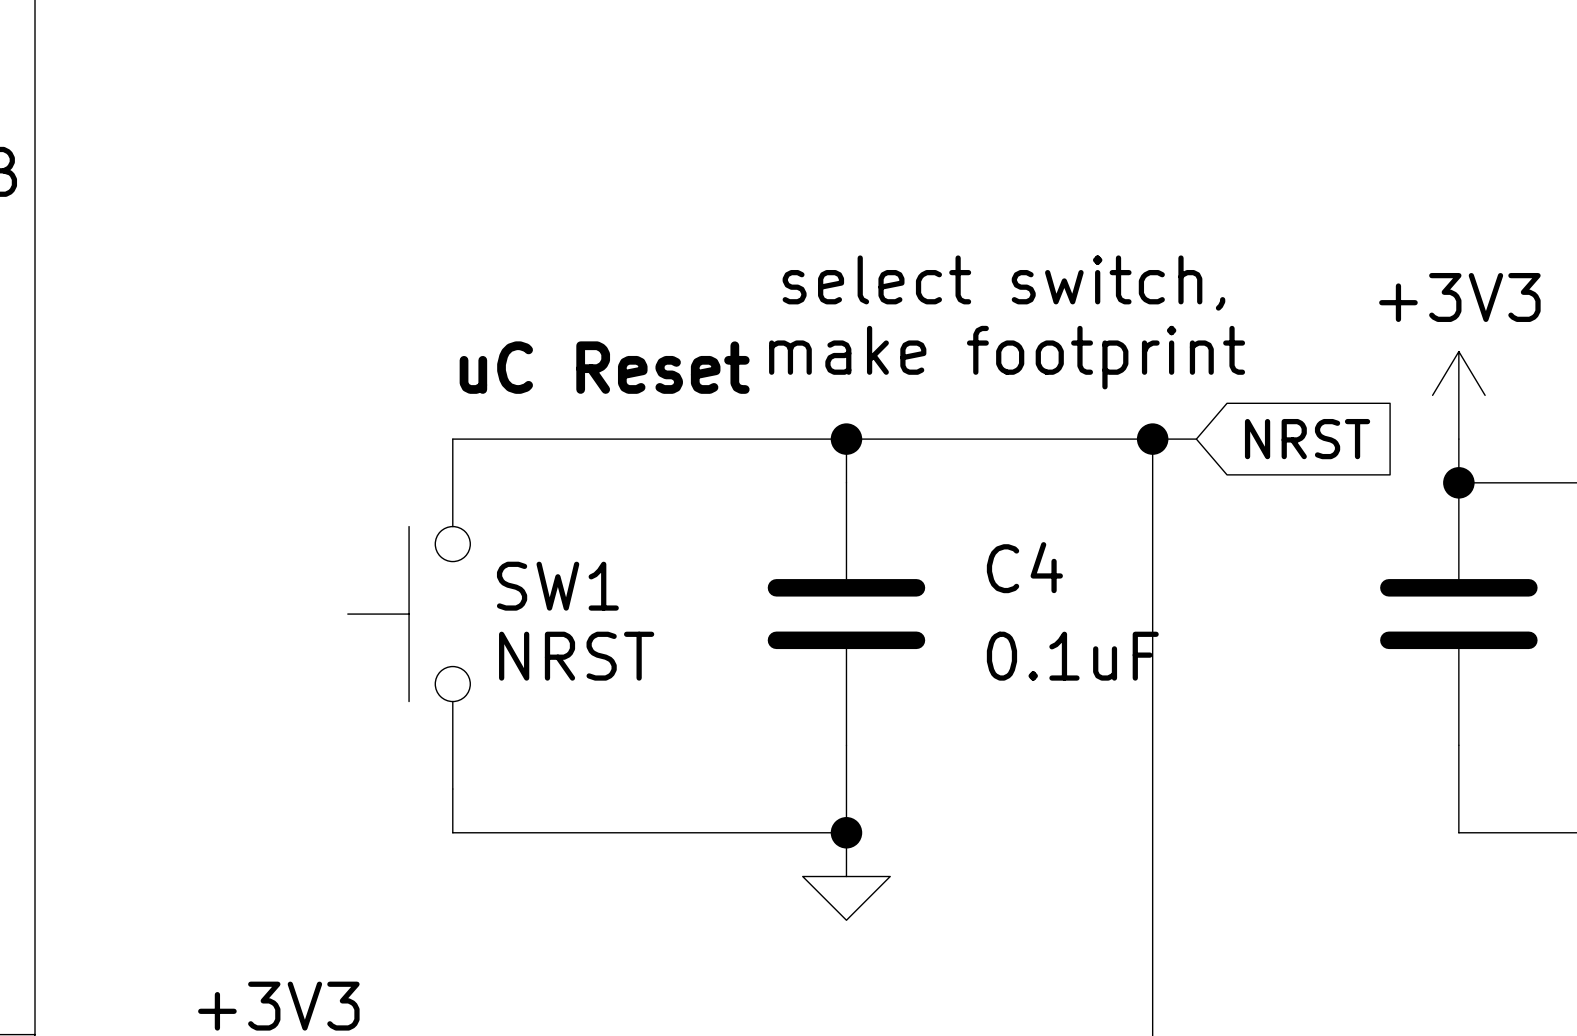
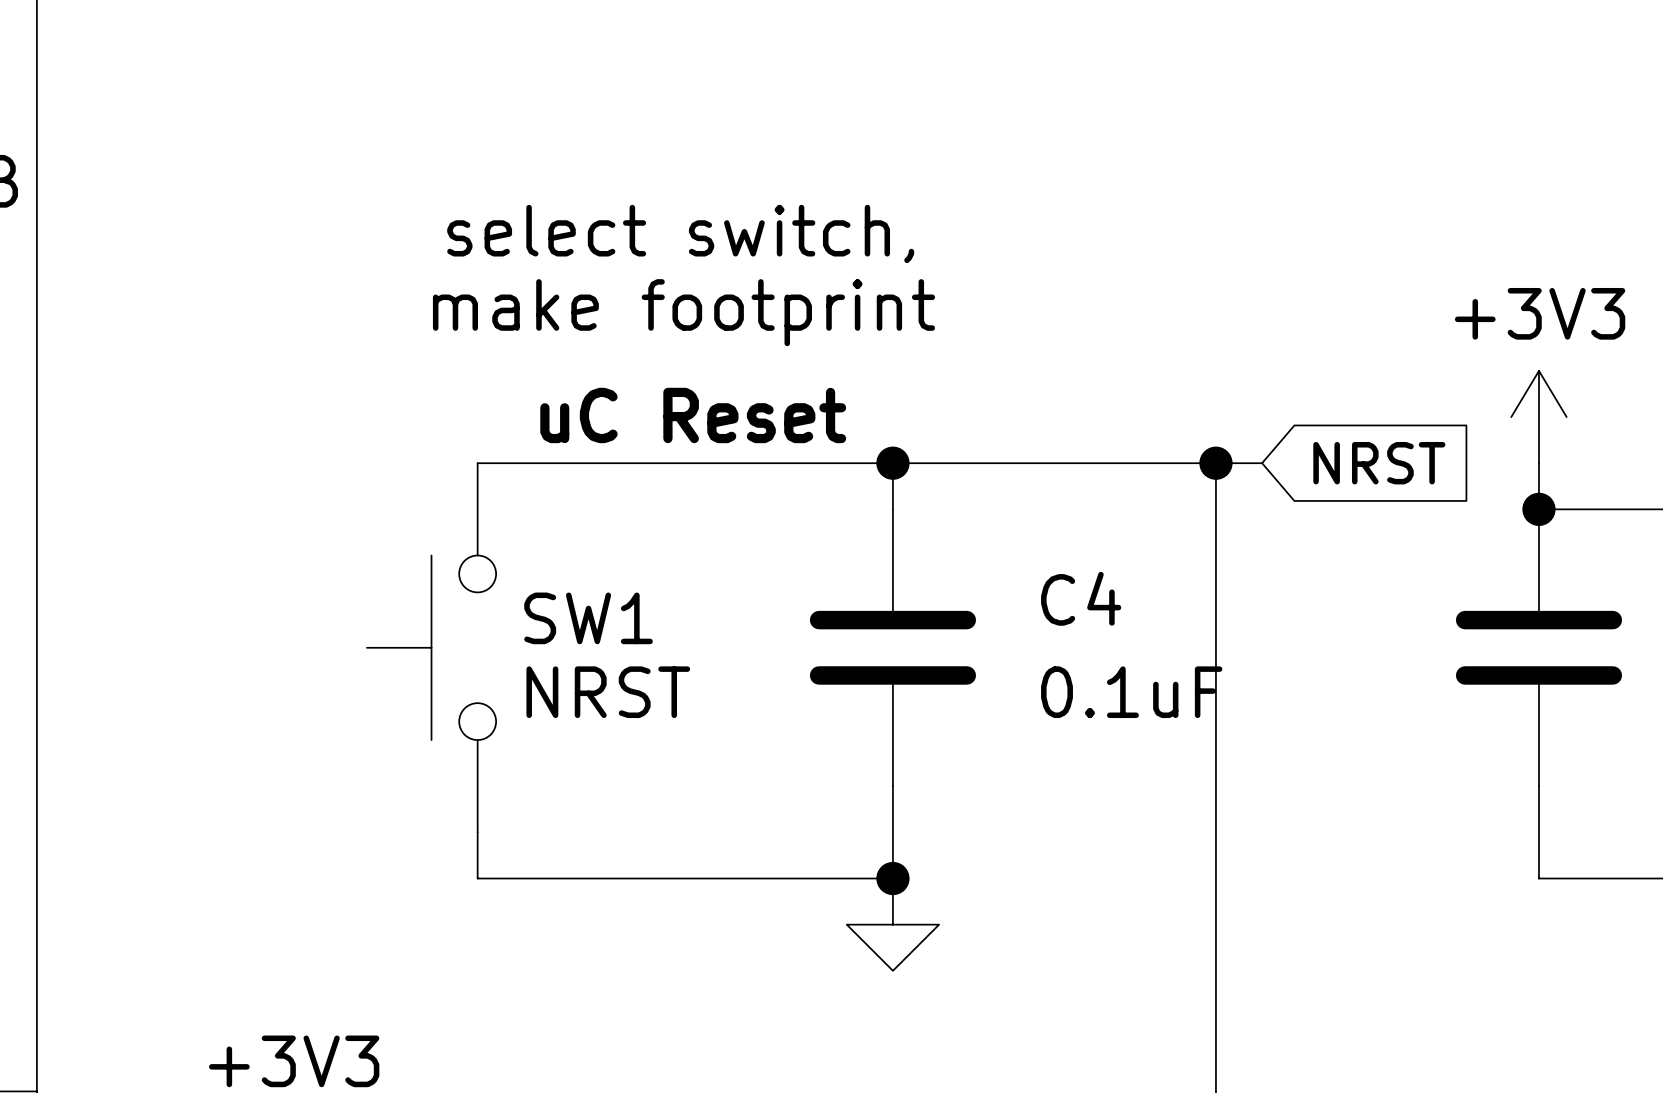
text position: select switch, (1003, 283) -> select switch, (680, 233)
text position: make footprint (1007, 357) -> make footprint (683, 312)
text position: uC Reset (604, 367) -> uC Reset (693, 415)

